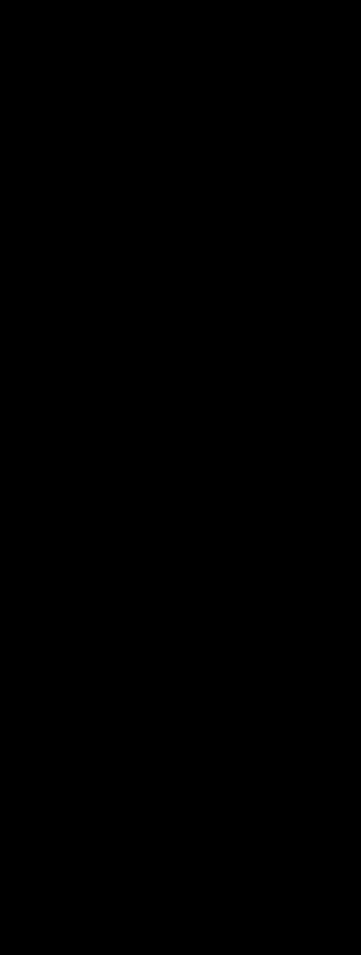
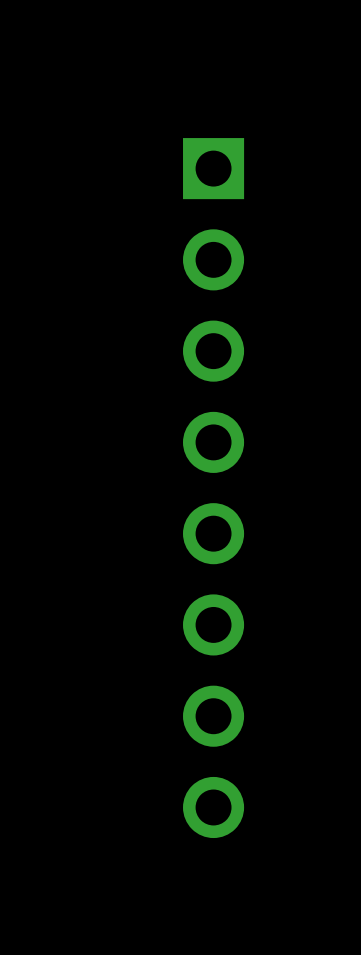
part: none -> (213, 488)

